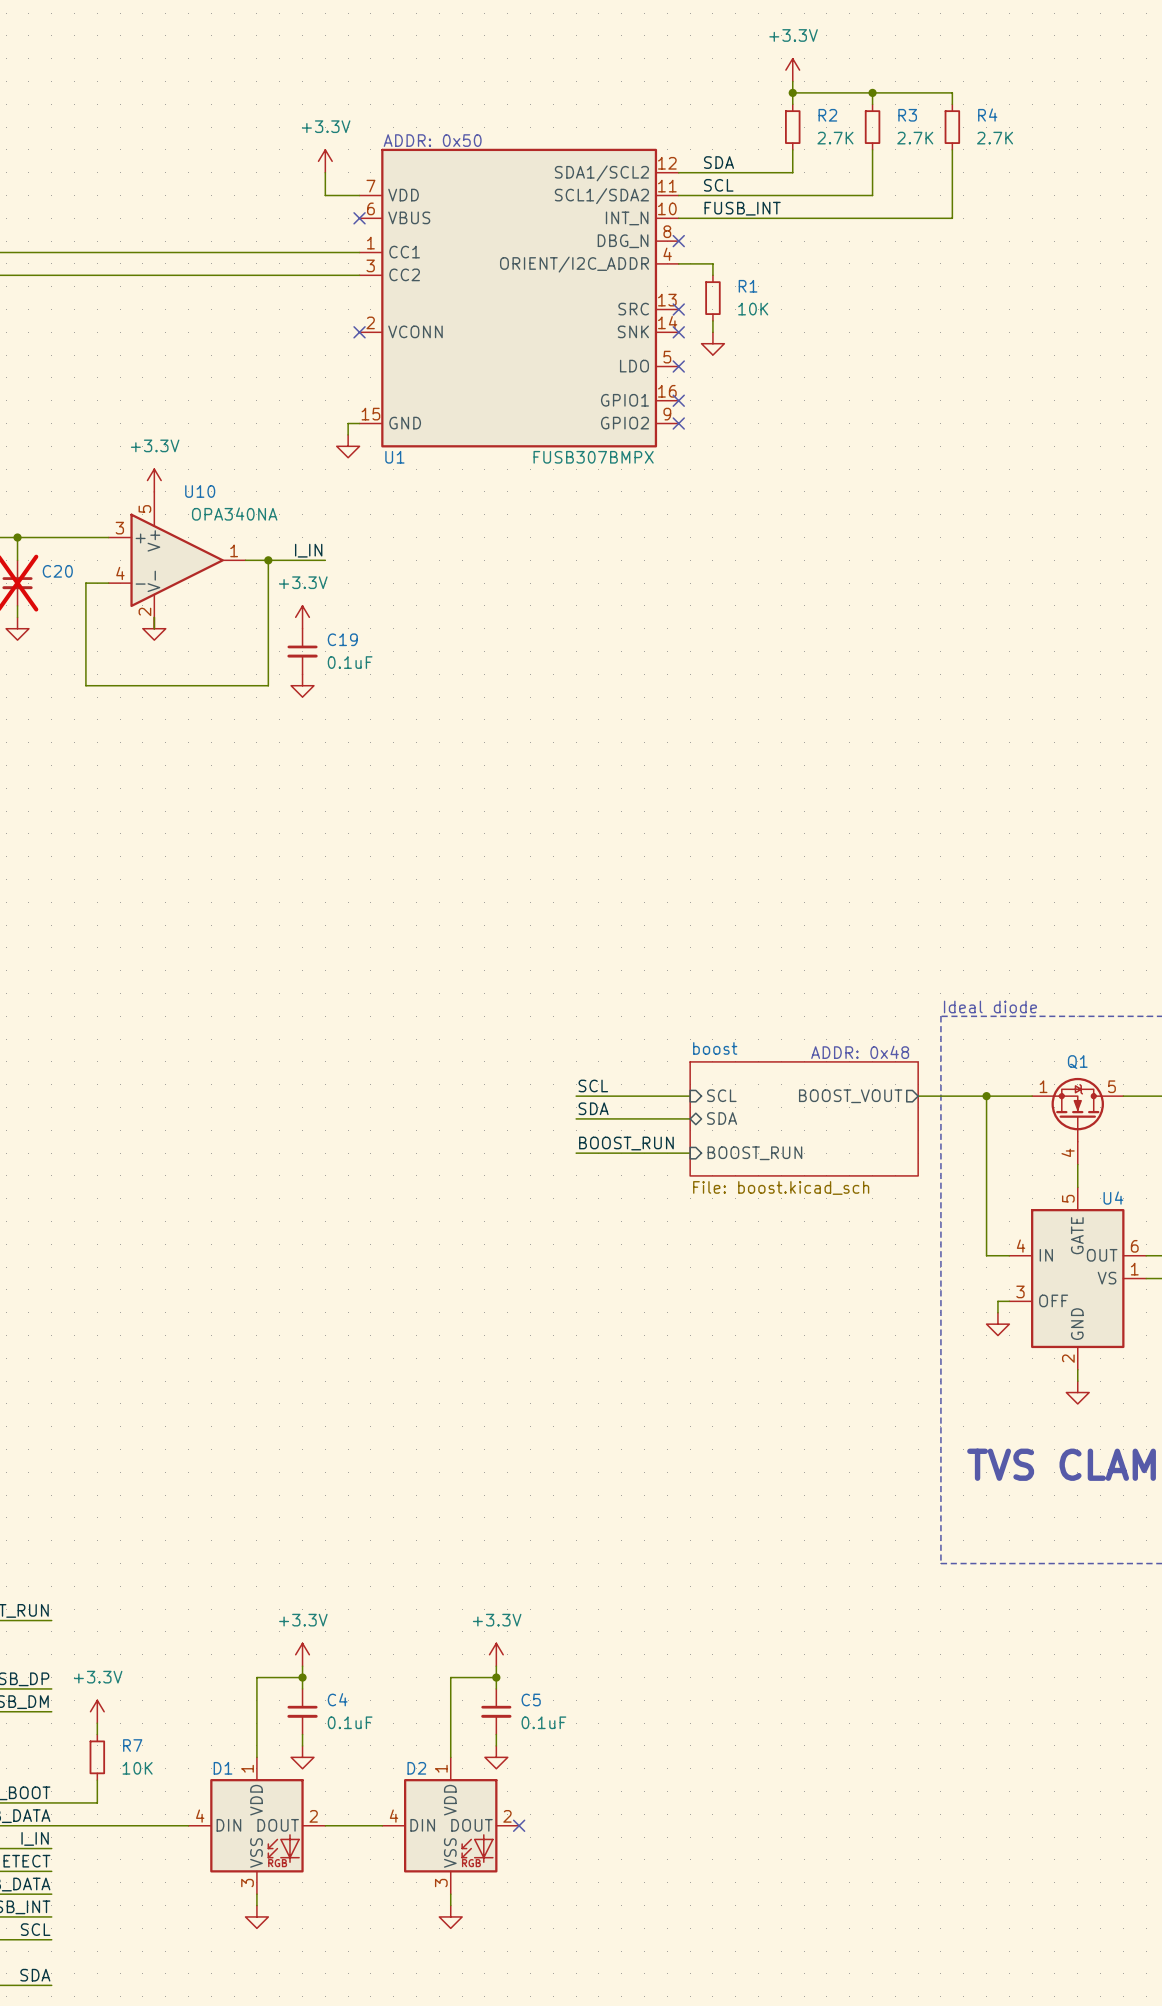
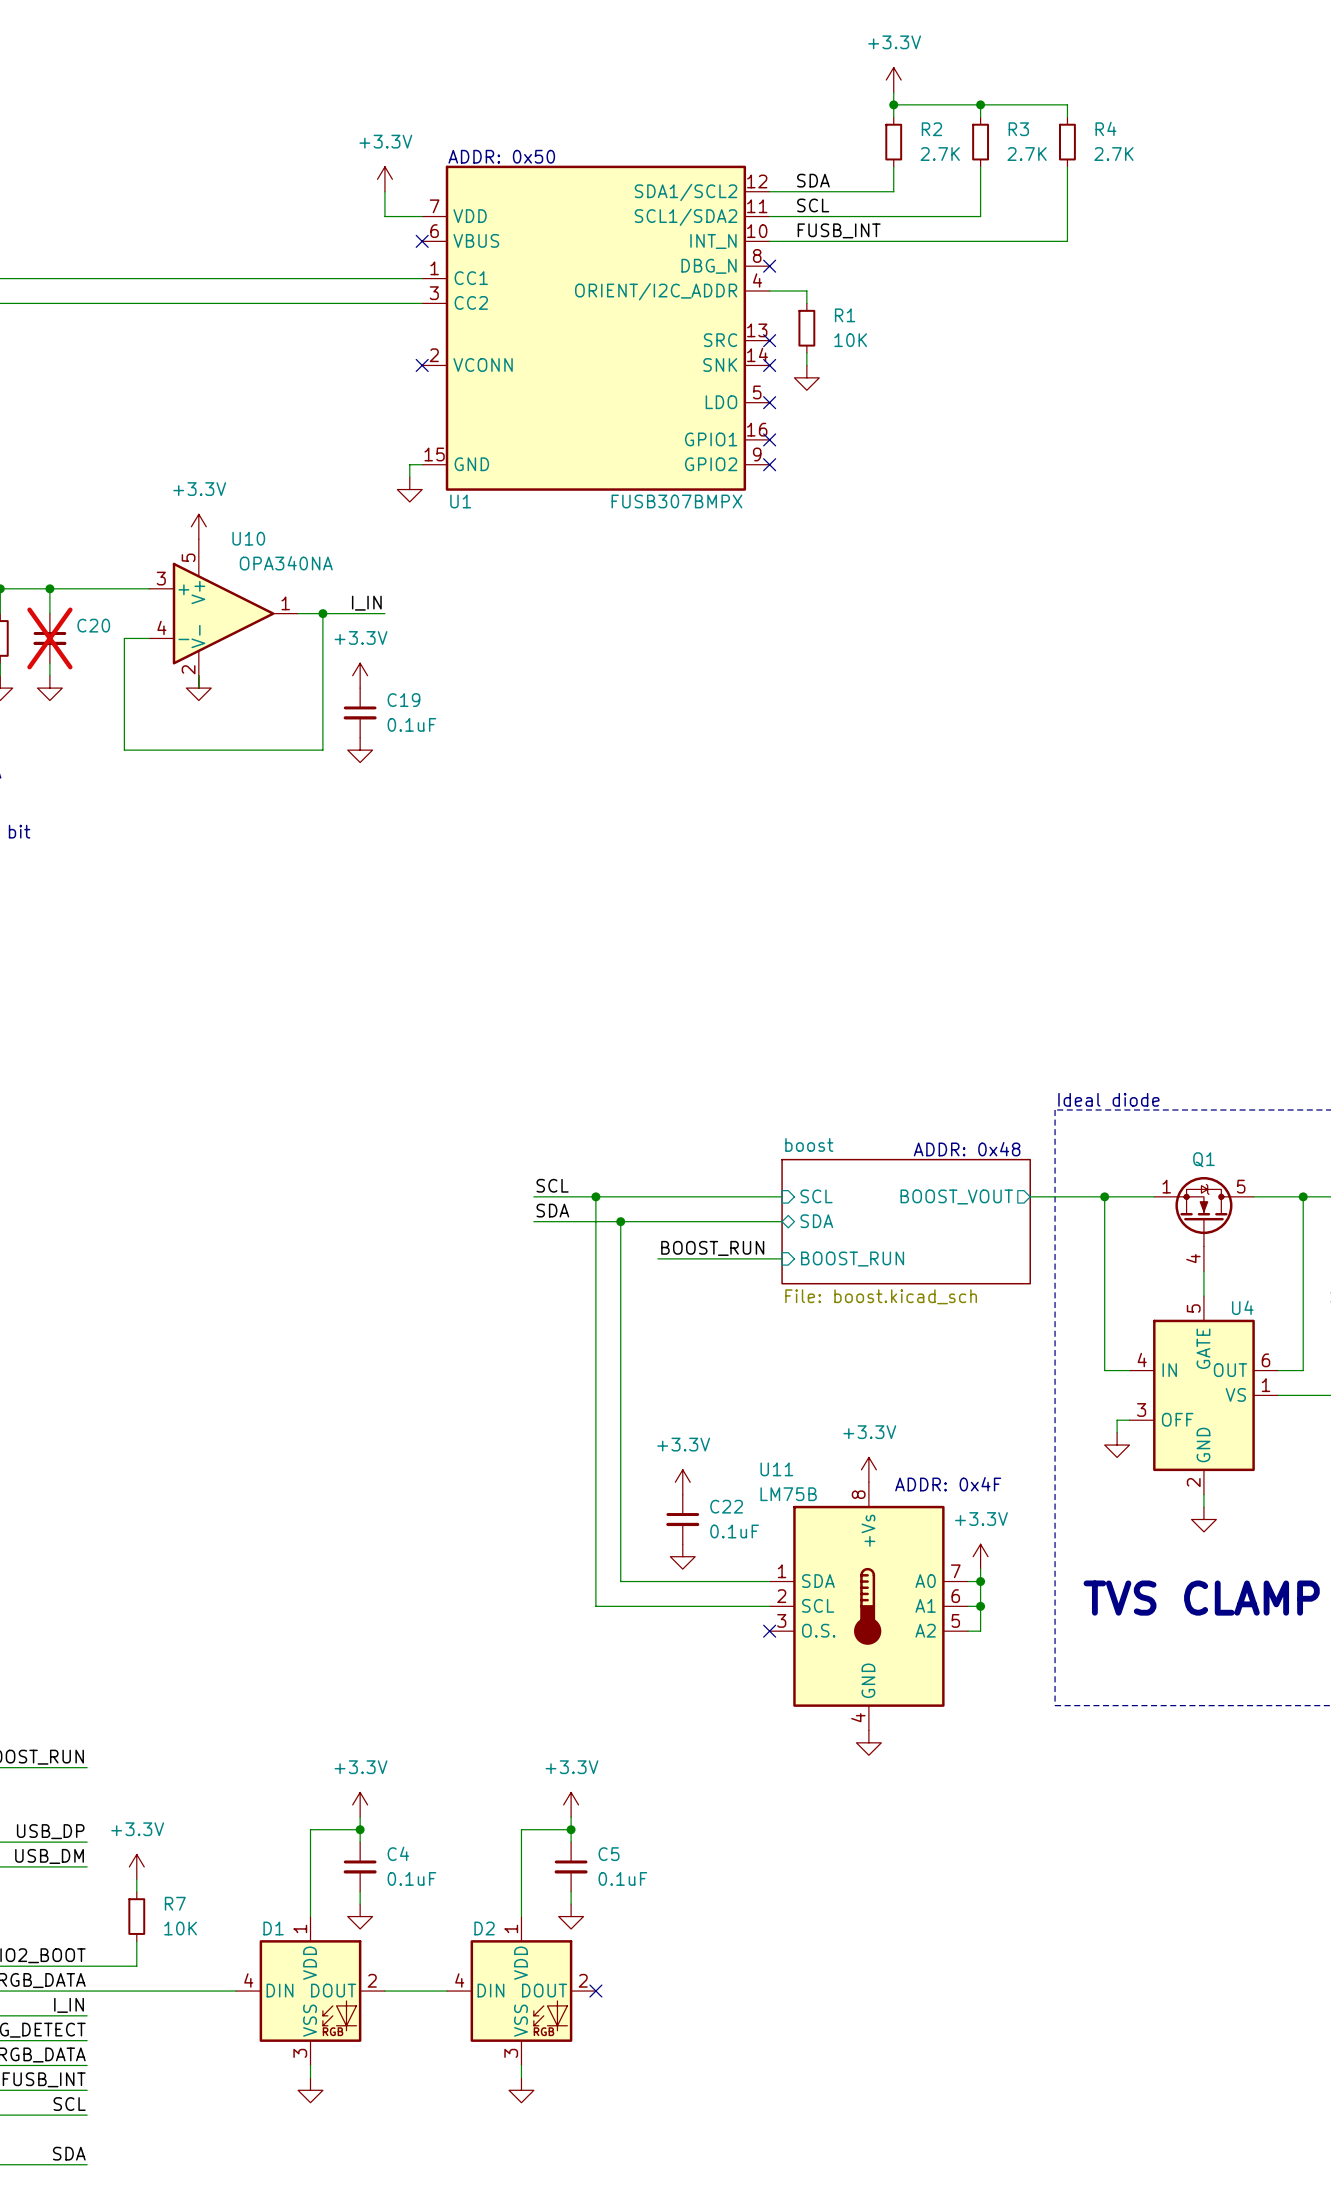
label position: SCL (593, 1085) -> SCL (552, 1185)
wire: none -> (533, 1196) (657, 1196)
wire: none -> (595, 1196) (595, 1606) (769, 1606)
junction: none -> (595, 1196)
label position: SDA (593, 1108) -> SDA (552, 1210)
wire: none -> (533, 1221) (657, 1221)
wire: none -> (620, 1221) (620, 1581) (769, 1581)
junction: none -> (620, 1221)
power symbol: none -> +3.3V (868, 1469)
power symbol: none -> +3.3V (682, 1482)
text: none -> ADDR: 0x4F (948, 1484)
C22: none -> 0.1uF (682, 1519)
power symbol: none -> (682, 1556)
power symbol: none -> +3.3V (980, 1556)
wire: none -> (980, 1569) (980, 1631) (968, 1631)
wire: none -> (968, 1581) (980, 1581)
junction: none -> (980, 1581)
U11: none -> LM75B (868, 1606)
wire: none -> (968, 1606) (980, 1606)
junction: none -> (980, 1606)
no-connect mark: none -> (769, 1631)
power symbol: none -> (868, 1742)

